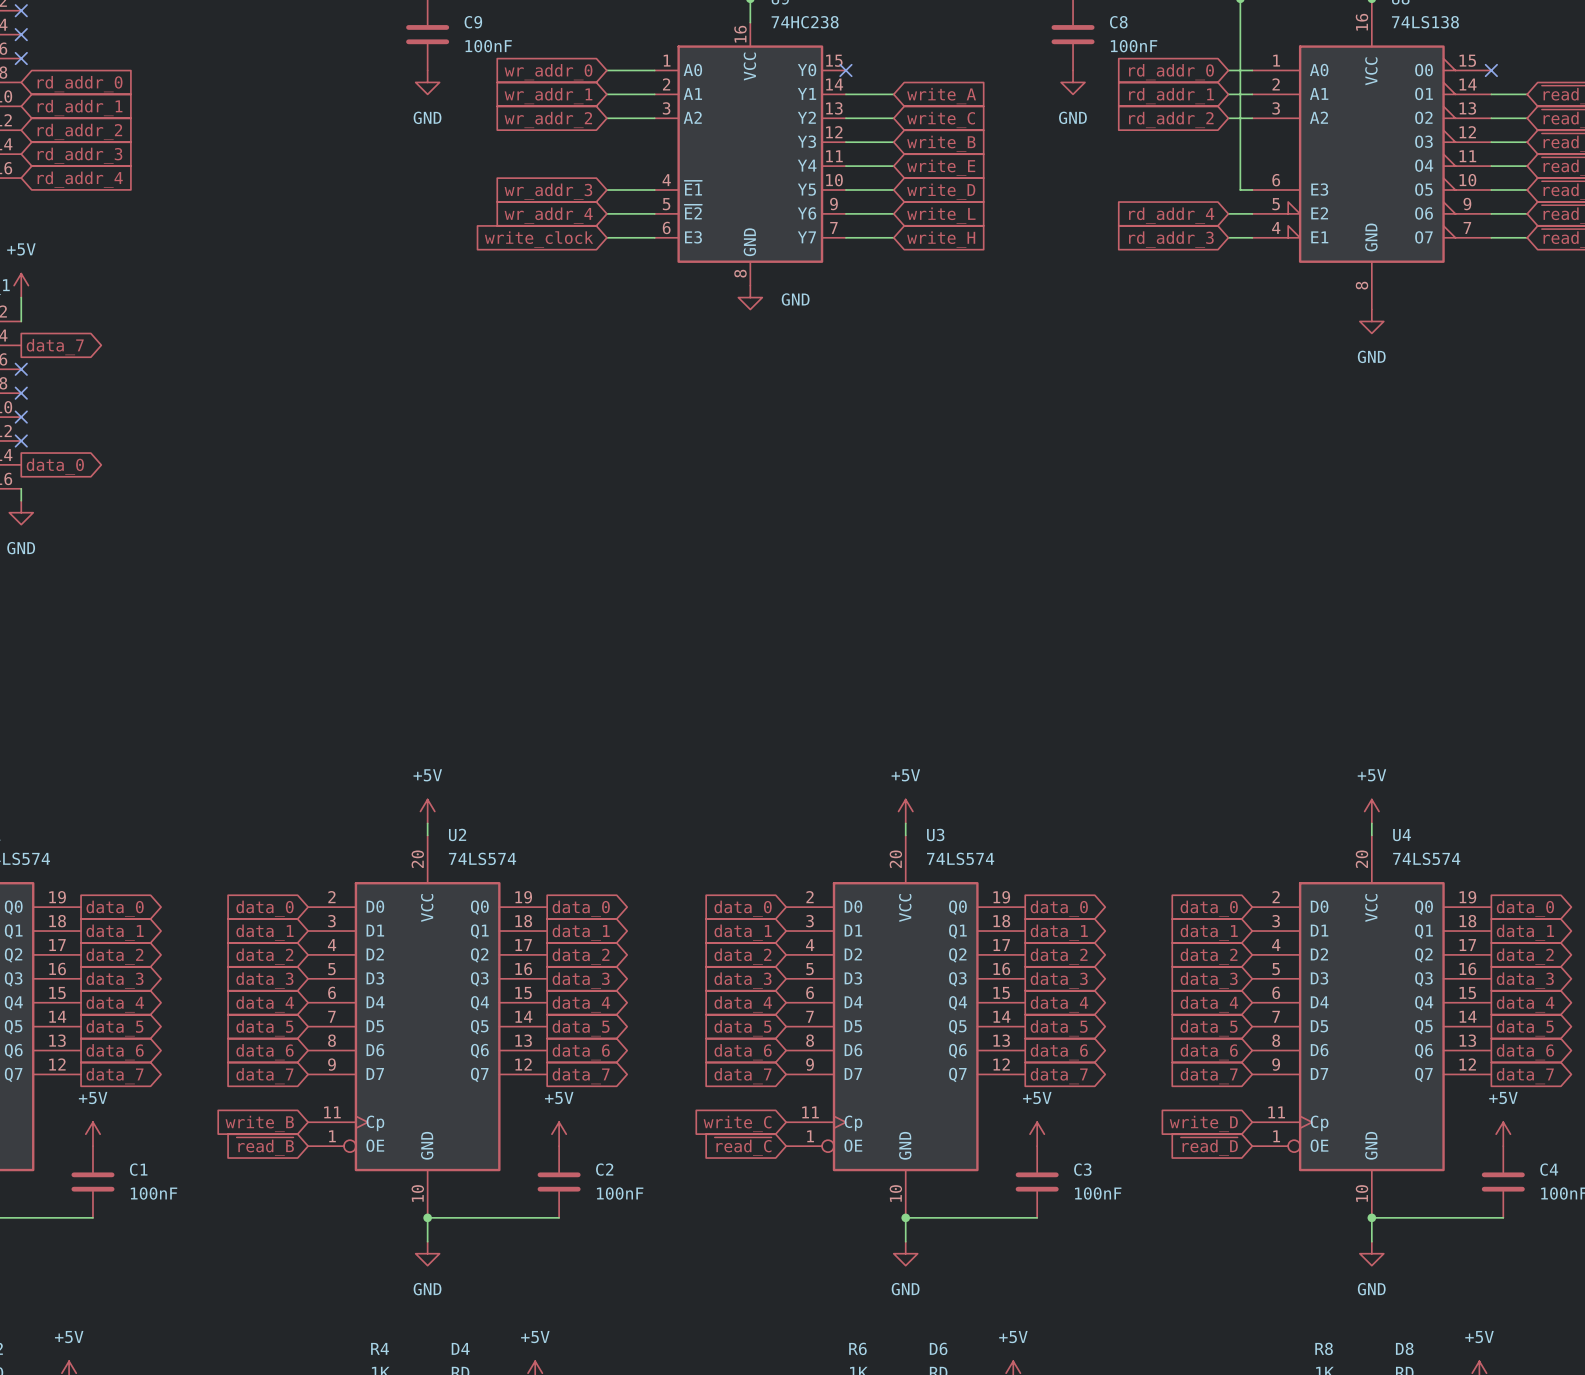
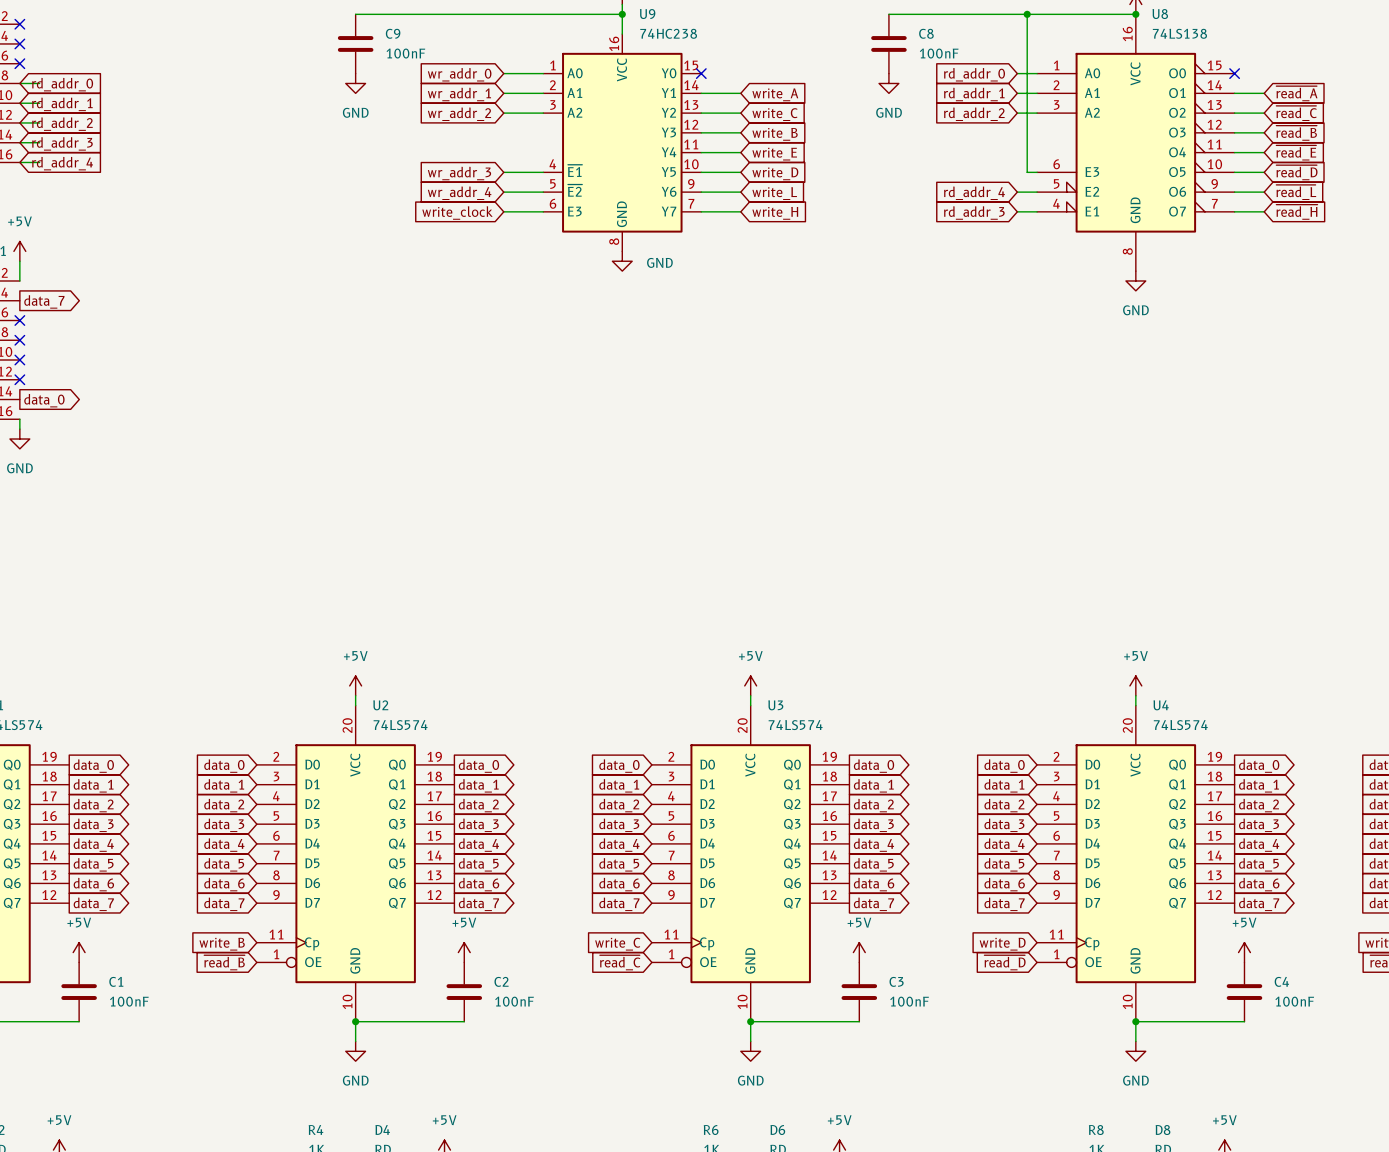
wire: none -> (19, 83) (39, 83)
wire: none -> (19, 103) (39, 103)
wire: none -> (19, 122) (39, 122)
wire: none -> (19, 142) (39, 142)
wire: none -> (19, 162) (39, 162)

